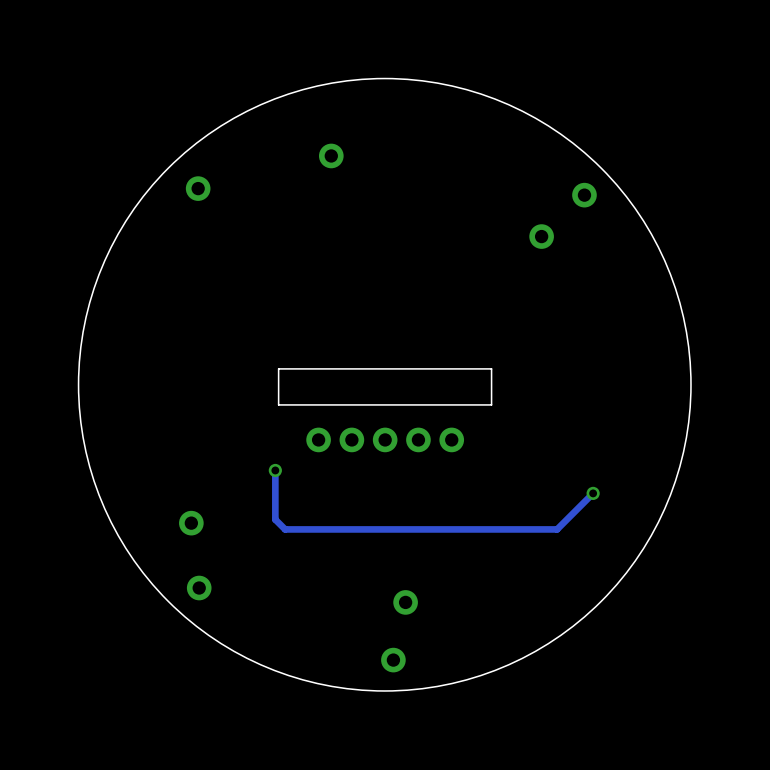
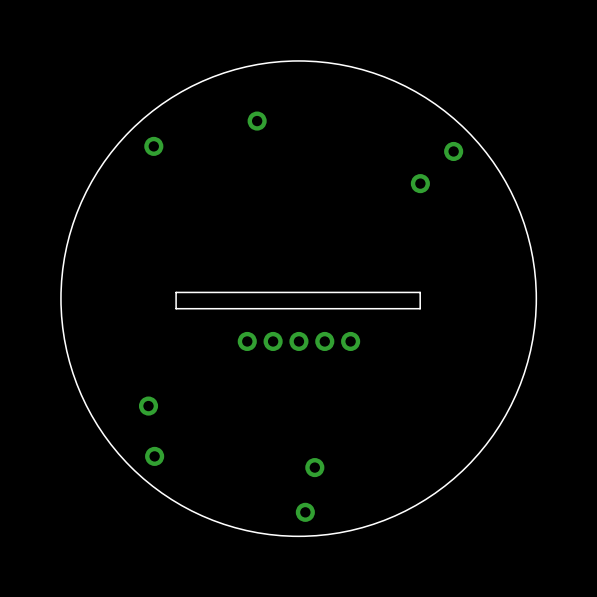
board edge: (491, 368) (491, 404) (278, 404) (278, 368) (491, 368) -> none
board edge: none -> (420, 292) (176, 292) (176, 308) (420, 308) (420, 292)
track: (275, 470) (275, 519) (285, 529) (557, 529) (593, 493) -> none
via: (275, 470) -> none
via: (593, 493) -> none

